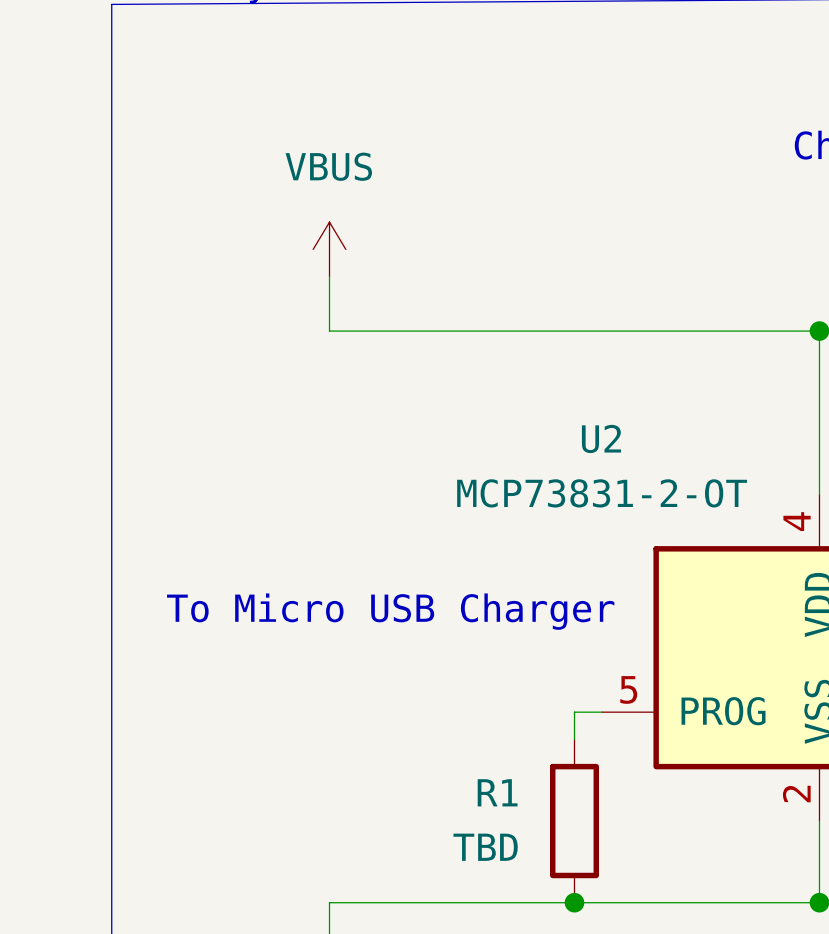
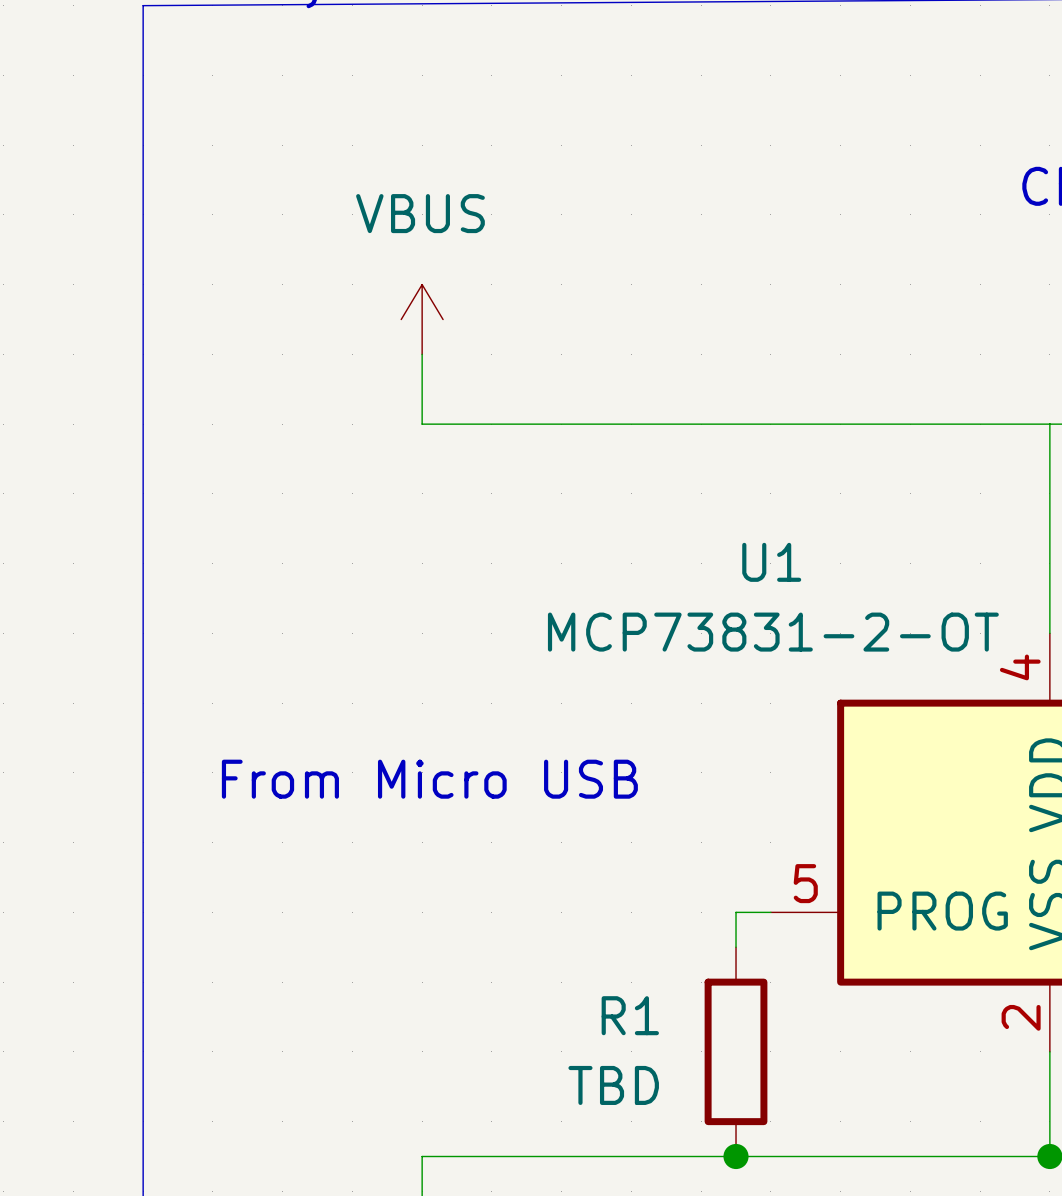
junction: (819, 331) -> none
U2 name: U2 (601, 438) -> U1 (771, 562)
text: To Micro USB Charger (390, 611) -> From Micro USB (429, 779)

